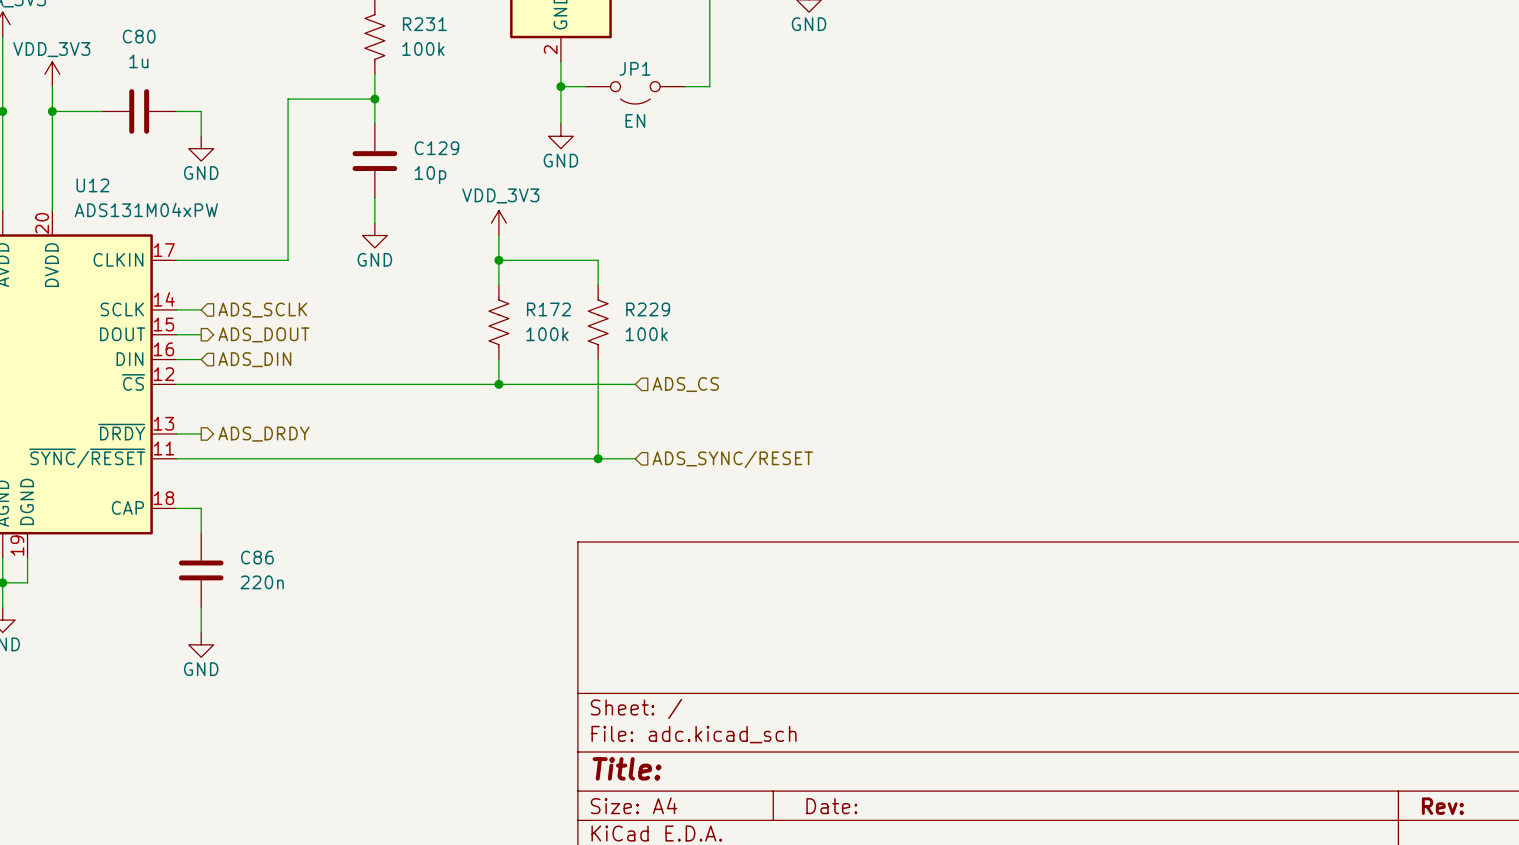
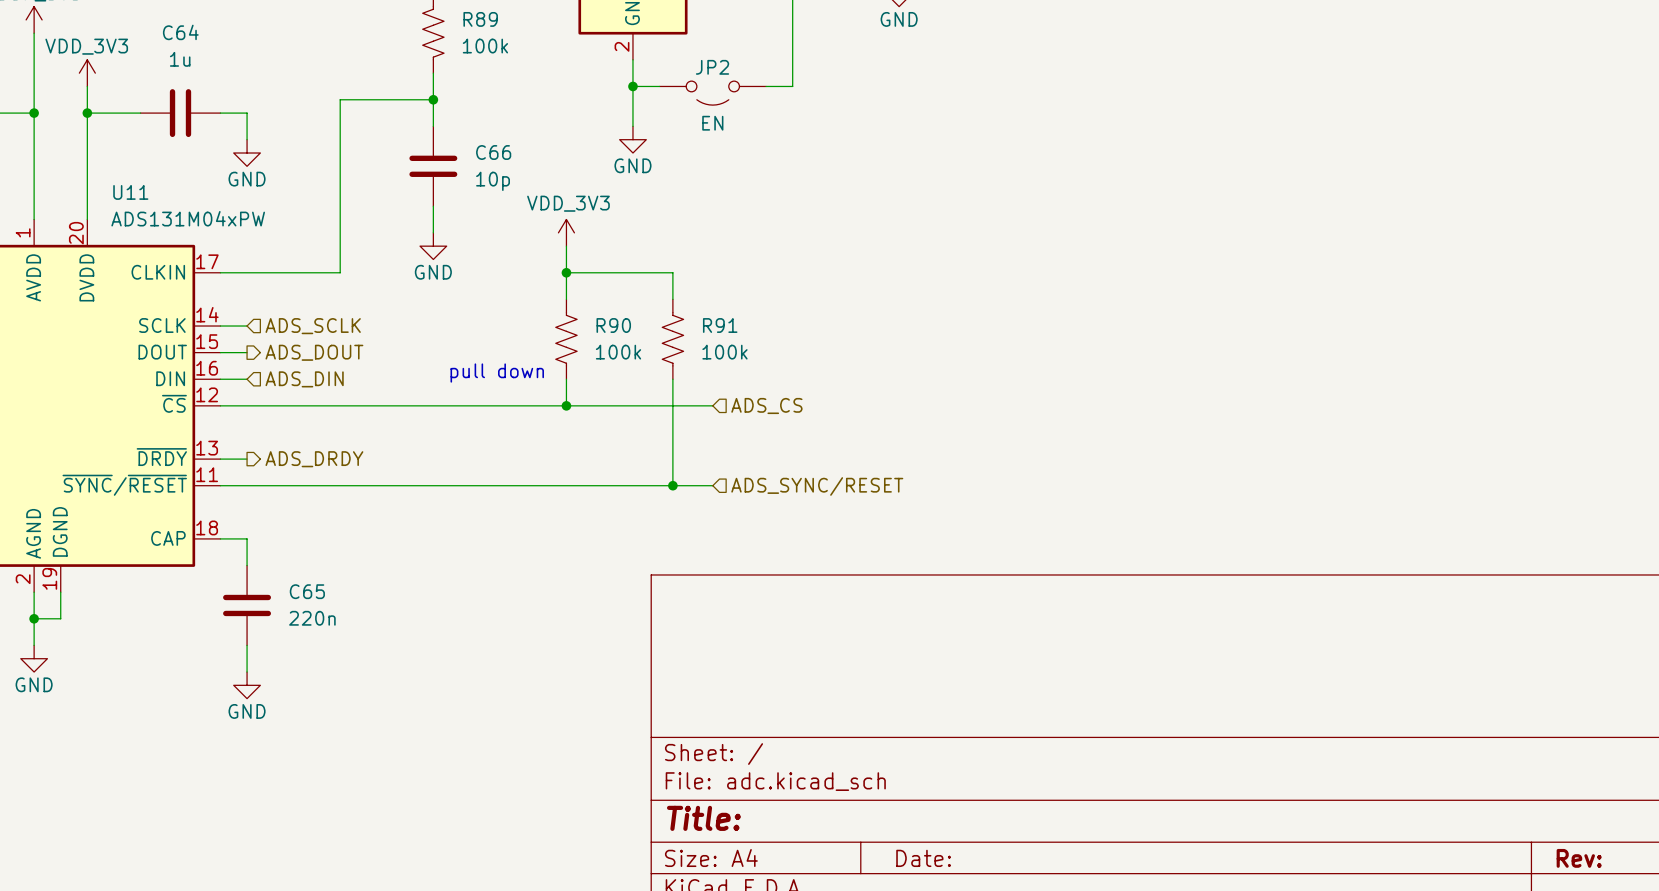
R231 name: R231 (424, 24) -> R89 (480, 19)
C80 name: C80 (139, 36) -> C64 (180, 32)
JP1 name: JP1 (635, 68) -> JP2 (712, 67)
C129 name: C129 (436, 148) -> C66 (493, 152)
U12 name: U12 (92, 185) -> U11 (130, 192)
R172 name: R172 (548, 309) -> R90 (613, 325)
R229 name: R229 (648, 309) -> R91 (720, 325)
text: none -> pull down (497, 373)
C86 name: C86 (257, 557) -> C65 (307, 591)

